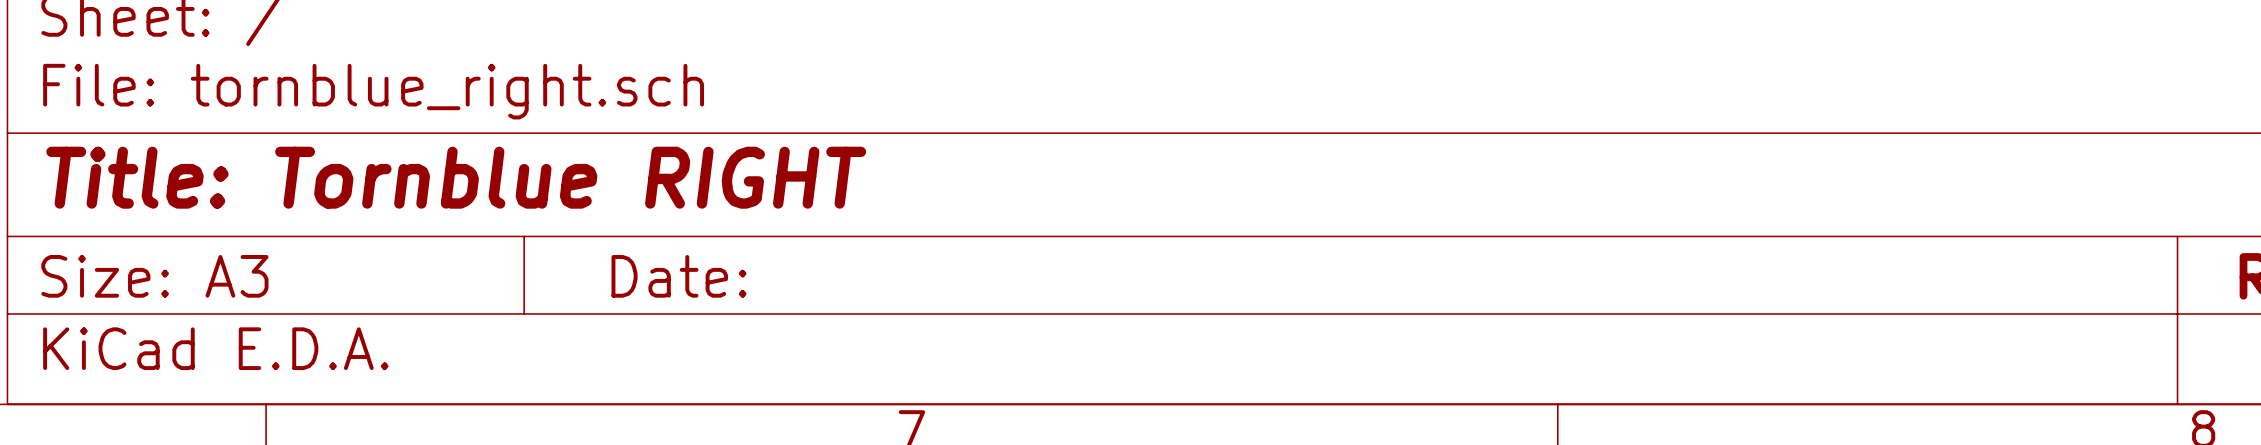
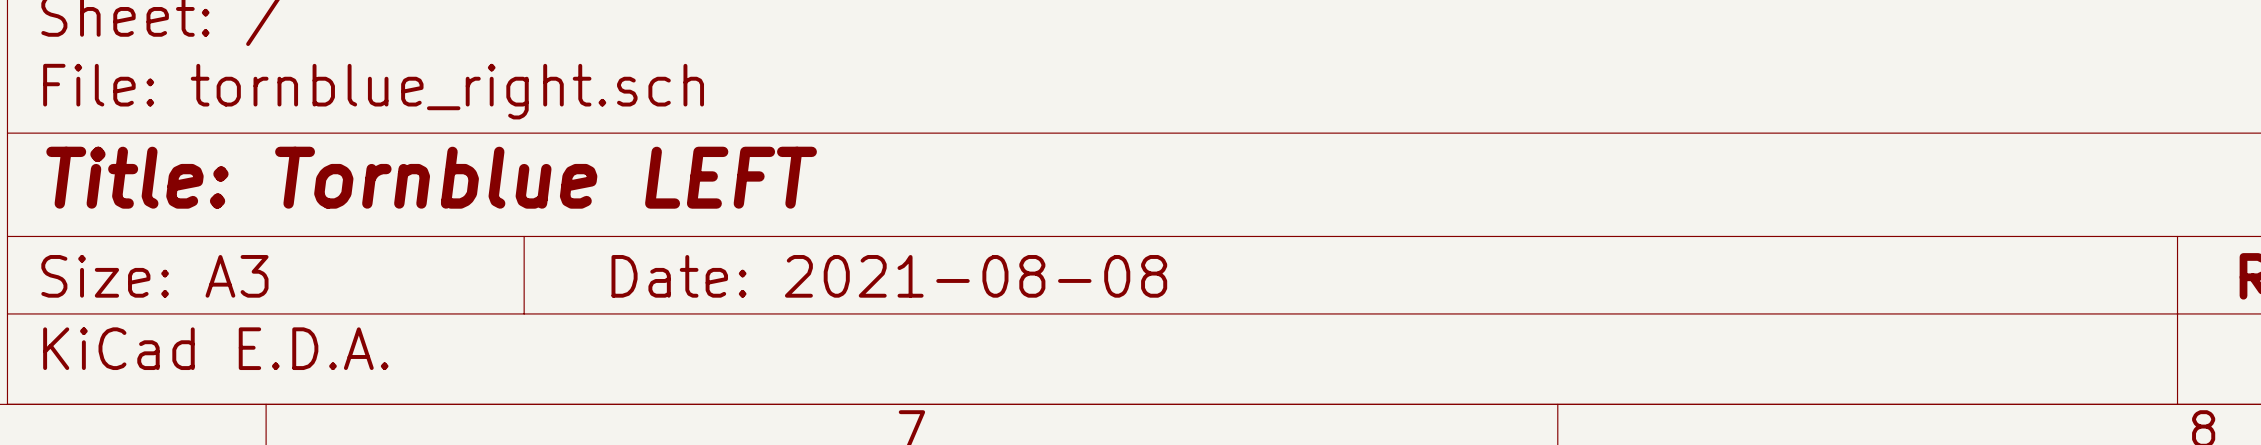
title block: Title: Tornblue RIGHT (456, 177) -> Title: Tornblue LEFT (431, 177)
title block: Date: (678, 276) -> Date: 2021-08-08 (889, 276)

